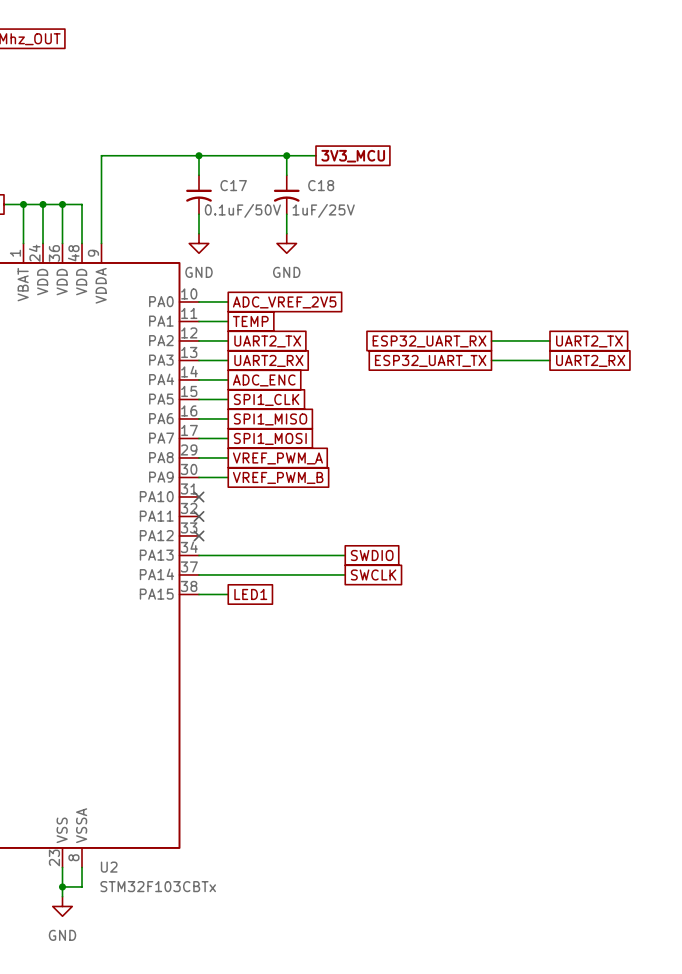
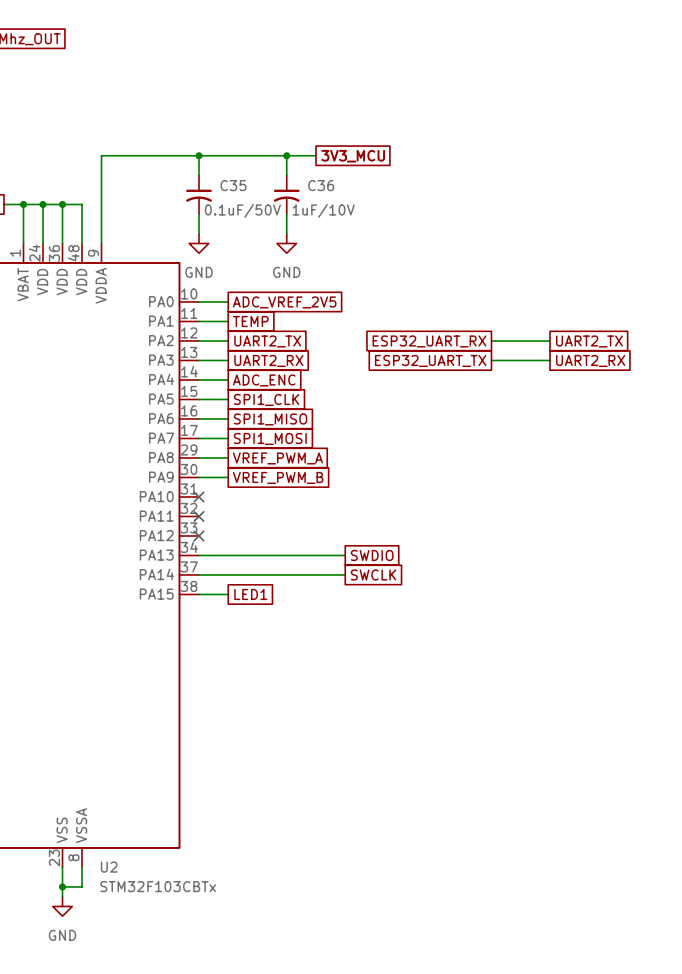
C17 name: C17 (233, 185) -> C35 (233, 185)
C18 name: C18 (321, 185) -> C36 (321, 185)
C18 value: 1uF/25V (323, 210) -> 1uF/10V (323, 210)

